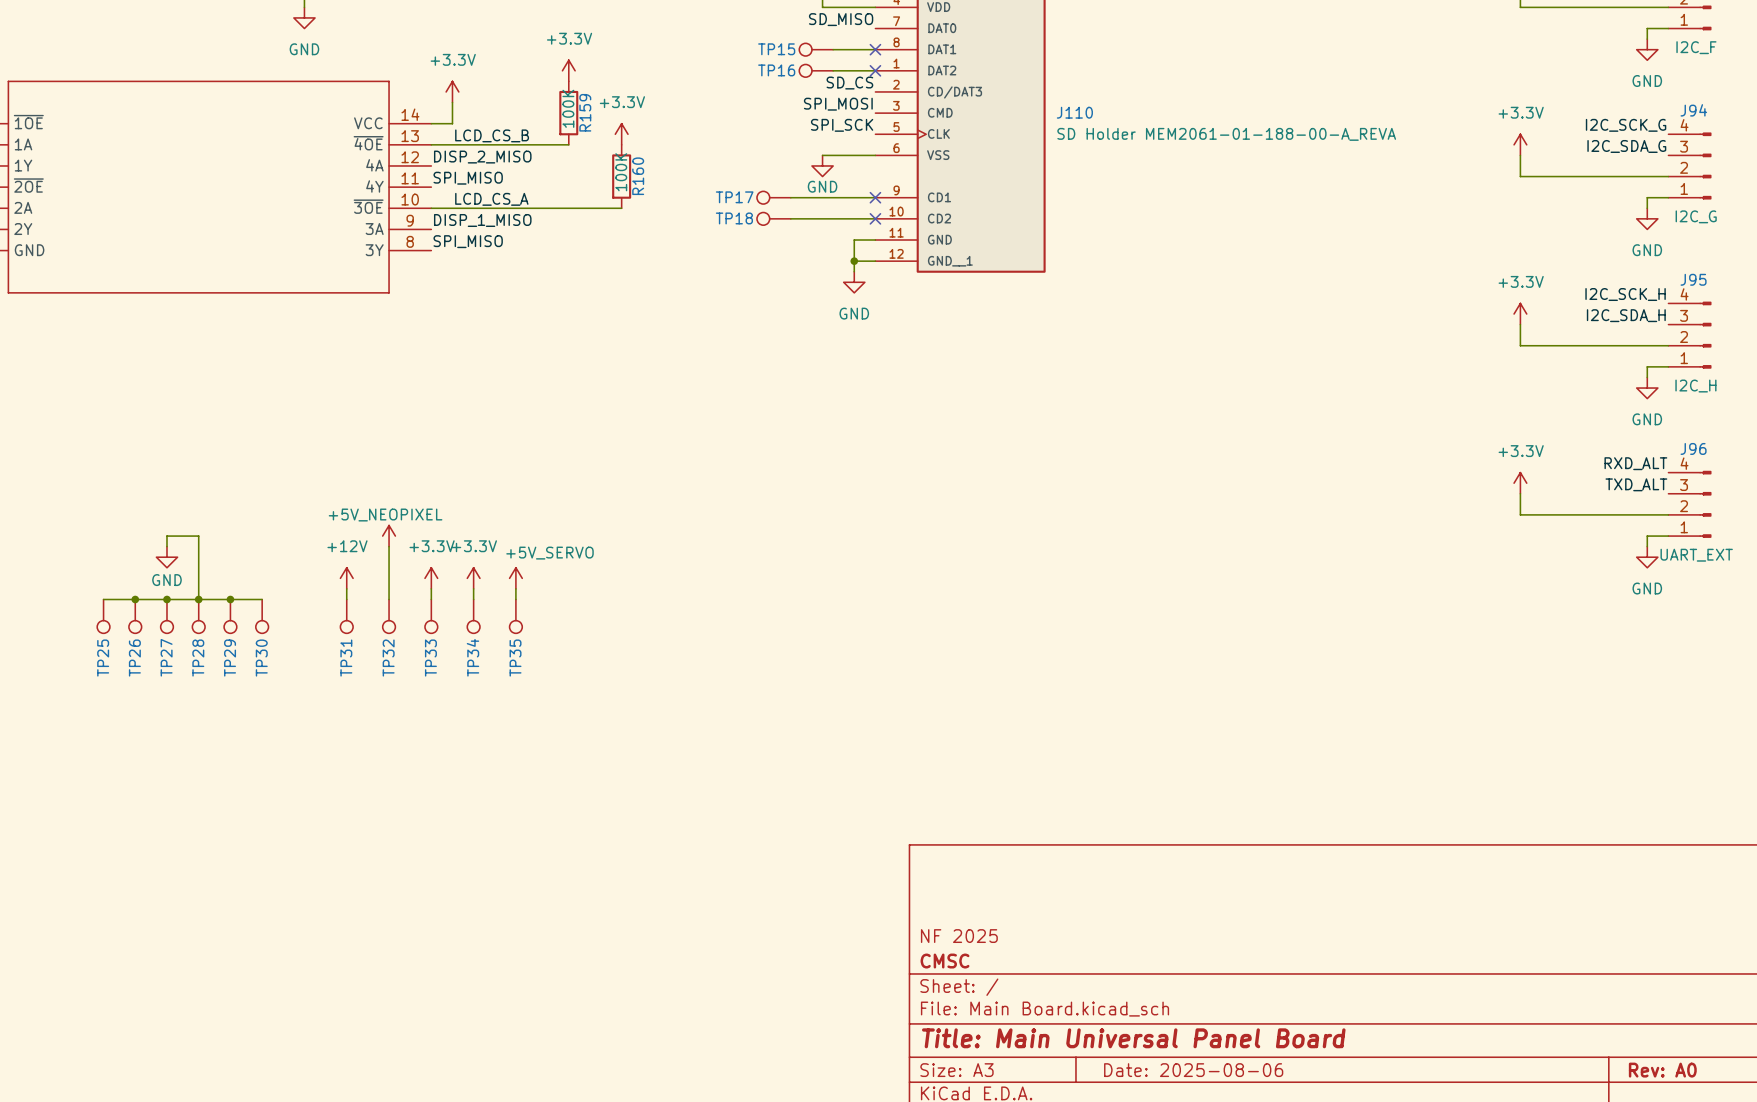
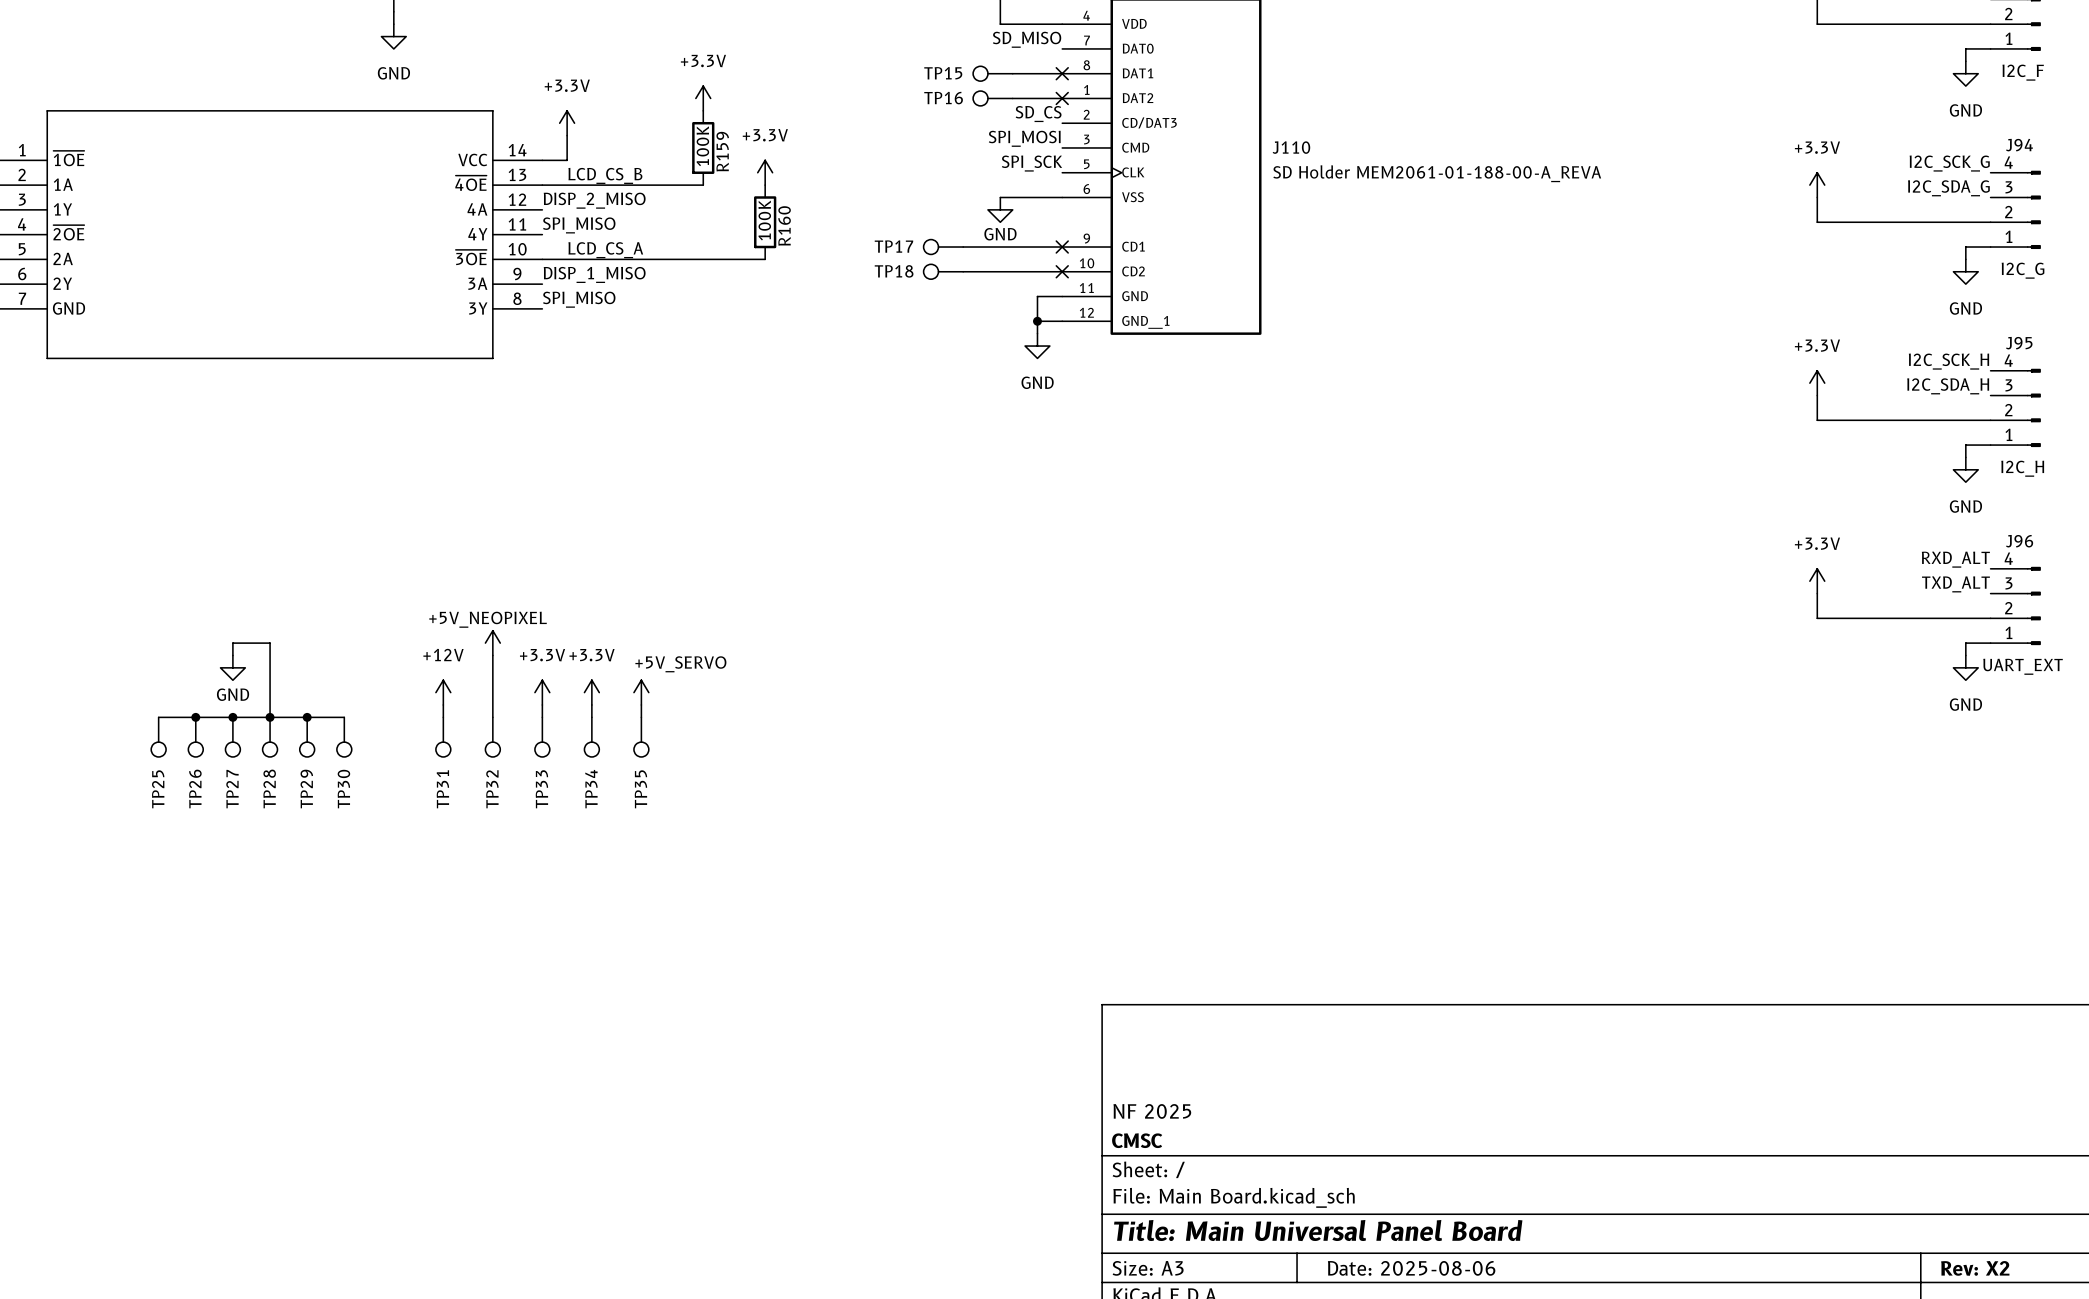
title block: Rev: A0 (1662, 1070) -> Rev: X2 (1975, 1268)

